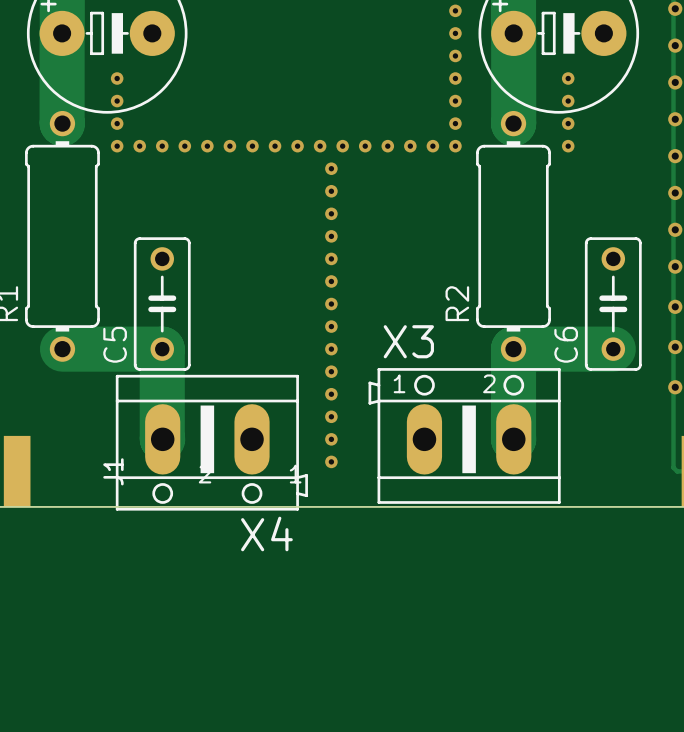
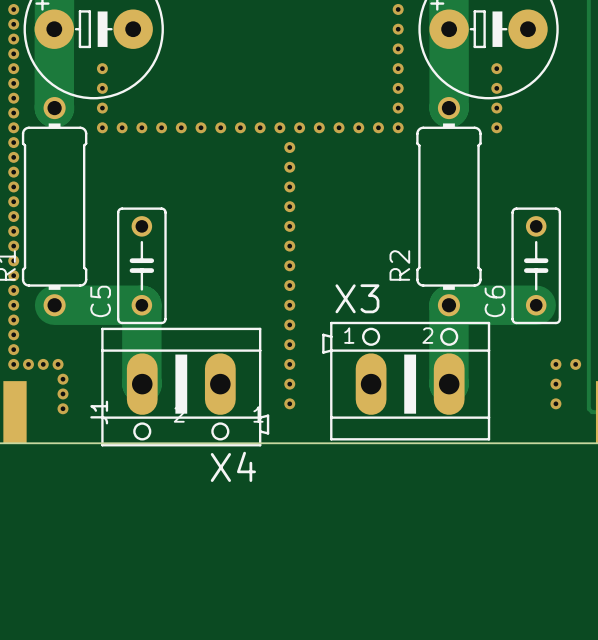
via: (675, 8) -> none
via: none -> (13, 9)
via: none -> (13, 24)
via: none -> (13, 39)
via: (675, 45) -> none
via: none -> (13, 53)
via: none -> (13, 68)
via: (675, 82) -> none
via: none -> (13, 83)
via: none -> (13, 98)
via: (675, 119) -> none
via: none -> (13, 113)
via: none -> (13, 127)
via: (675, 156) -> none
via: none -> (13, 142)
via: none -> (13, 157)
via: (675, 192) -> none
via: none -> (13, 172)
via: none -> (13, 186)
via: (675, 229) -> none
via: none -> (13, 201)
via: none -> (13, 216)
via: none -> (13, 231)
via: (675, 266) -> none
via: none -> (13, 246)
via: none -> (13, 260)
via: (675, 306) -> none
via: none -> (13, 275)
via: none -> (13, 290)
via: (675, 347) -> none
via: none -> (13, 305)
via: none -> (13, 320)
via: none -> (13, 334)
via: (675, 387) -> none
via: none -> (13, 349)
via: none -> (13, 364)
via: none -> (28, 364)
via: none -> (43, 364)
via: none -> (58, 364)
via: none -> (555, 364)
via: none -> (575, 364)
via: none -> (62, 379)
via: none -> (555, 384)
via: none -> (62, 393)
via: none -> (555, 403)
via: none -> (62, 408)

